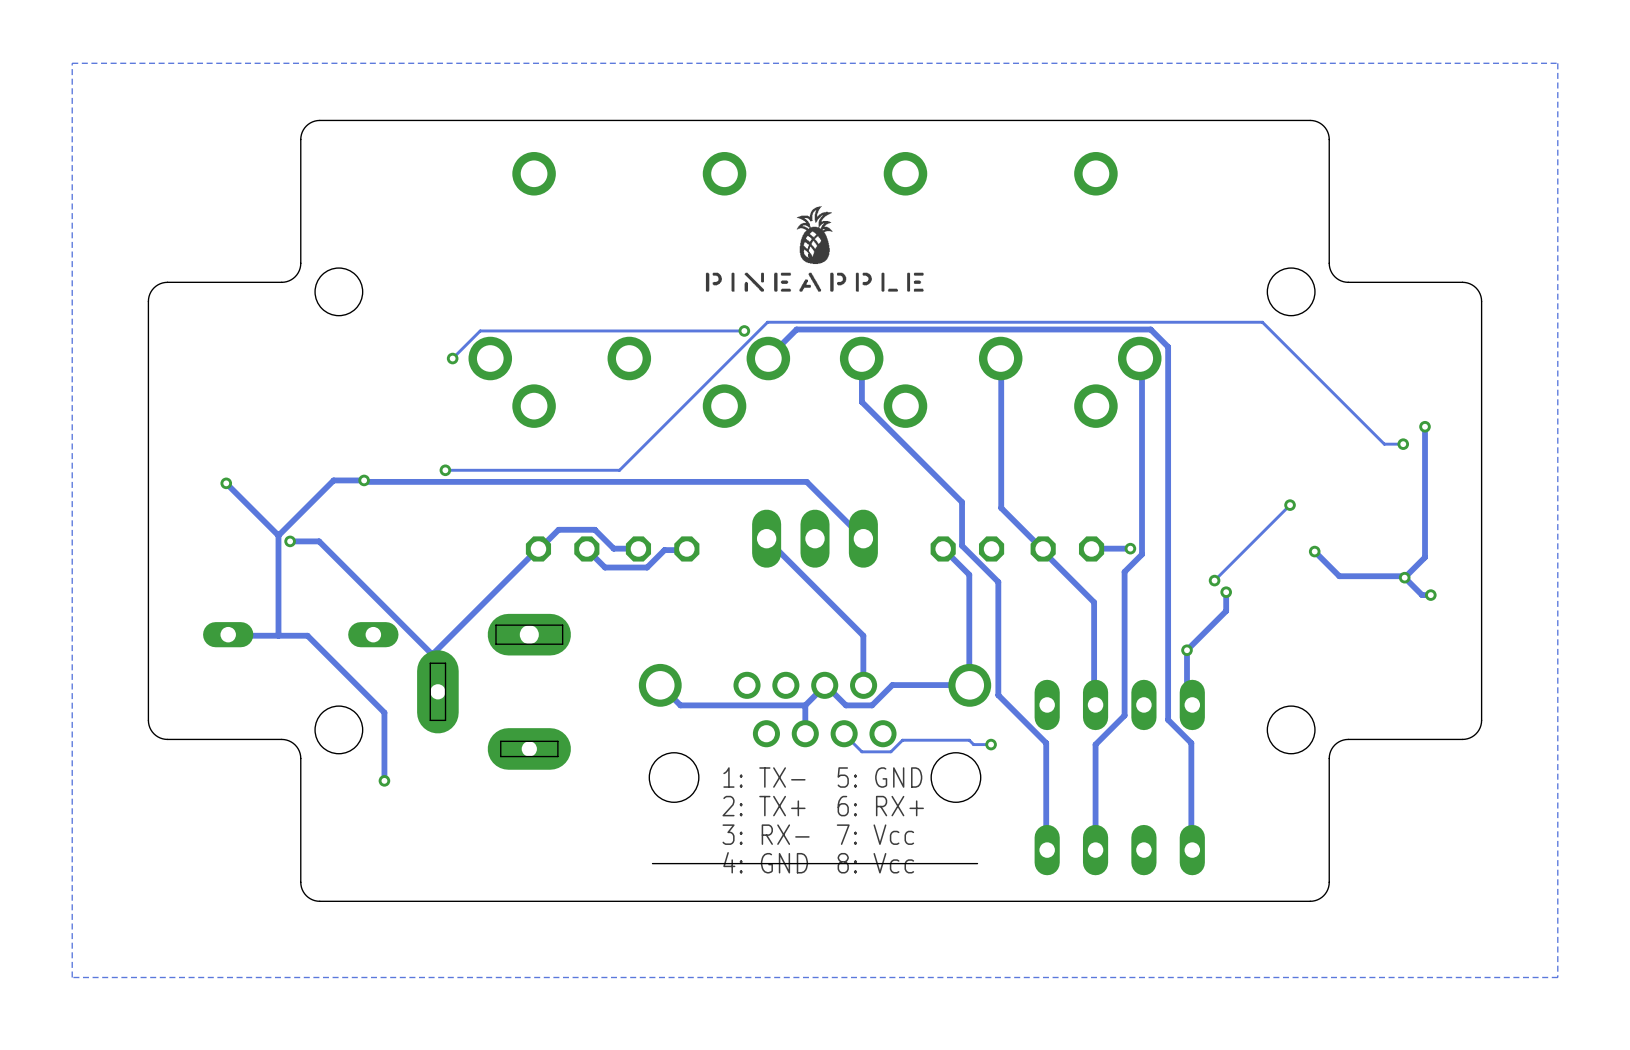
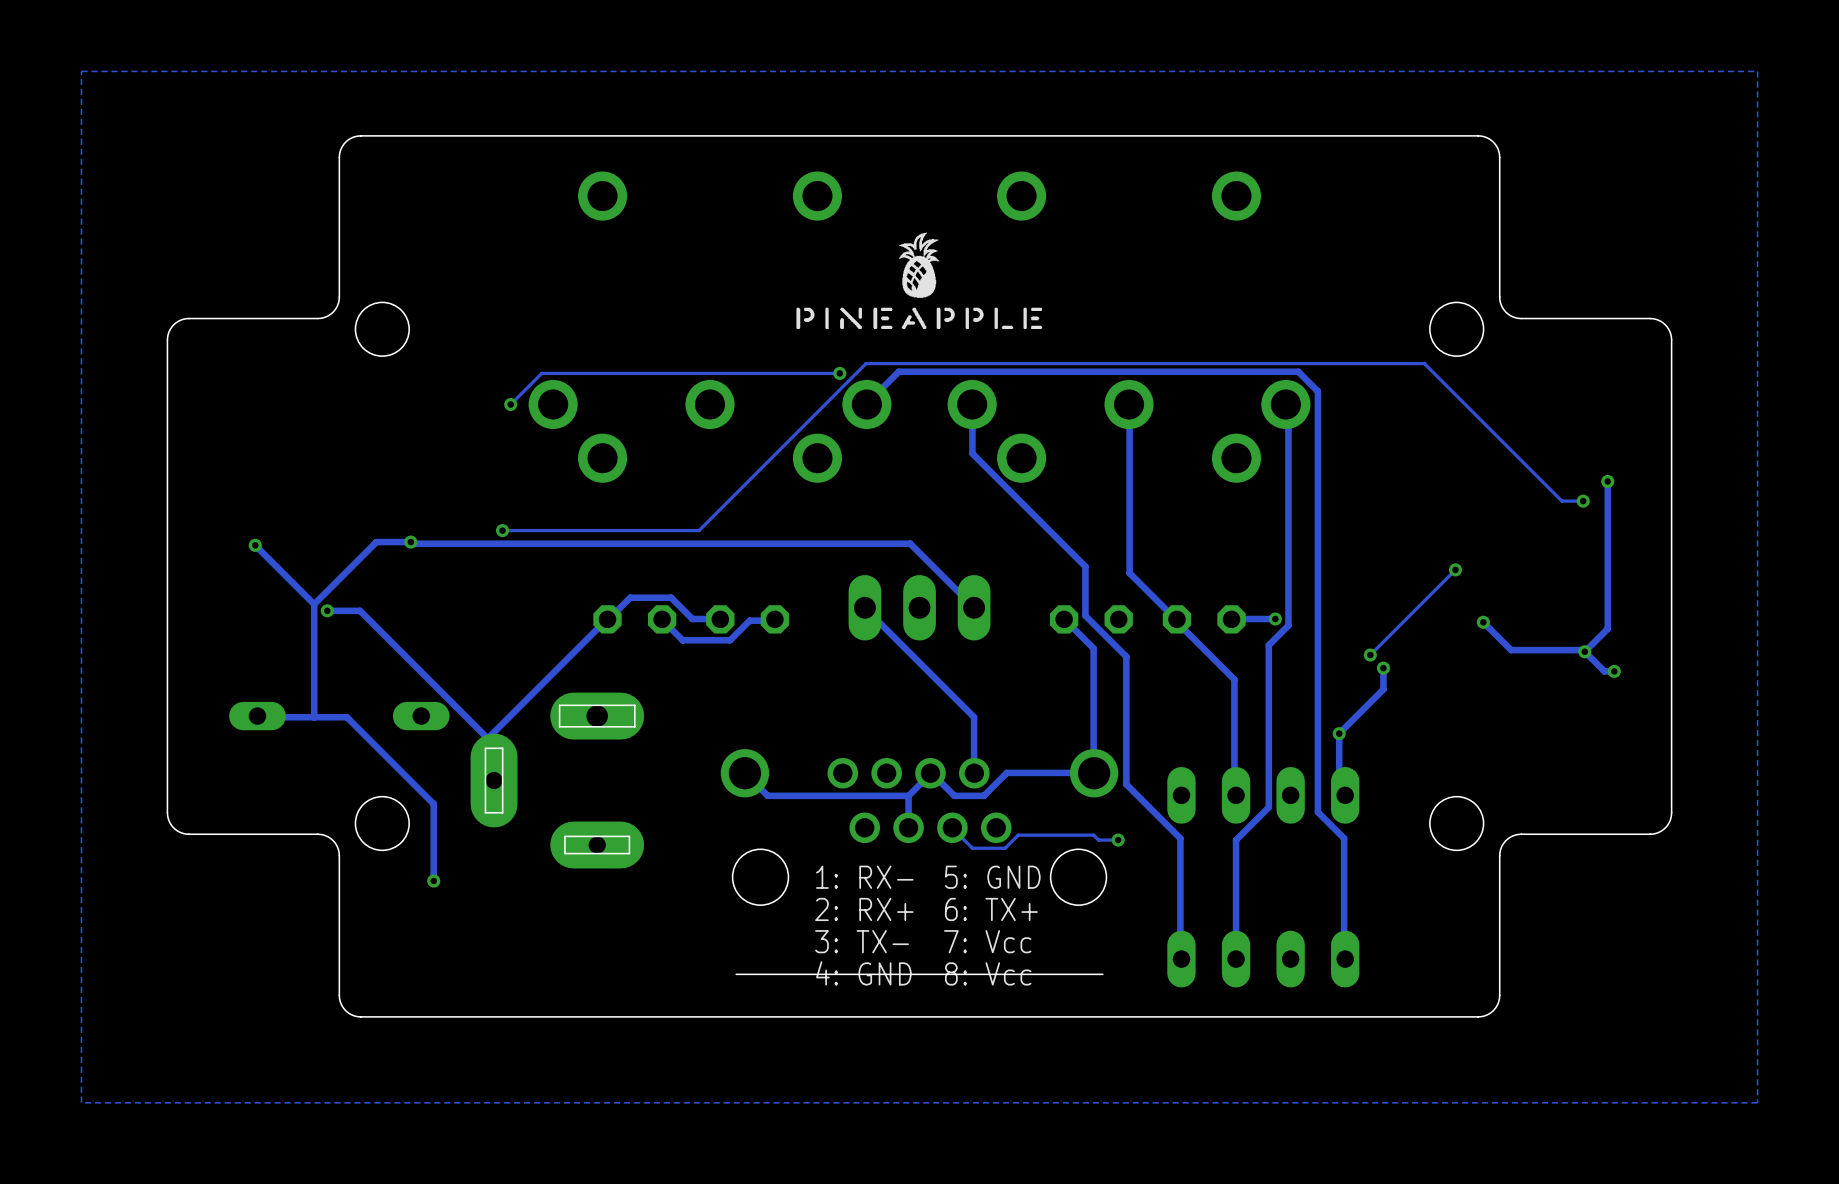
text: 1: TX- (764, 777) -> 1: RX- (864, 877)
text: 2: TX+ (764, 806) -> 2: RX+ (864, 909)
text: 6: RX+ (880, 806) -> 6: TX+ (991, 909)
text: 3: RX- (766, 834) -> 3: TX- (862, 941)

